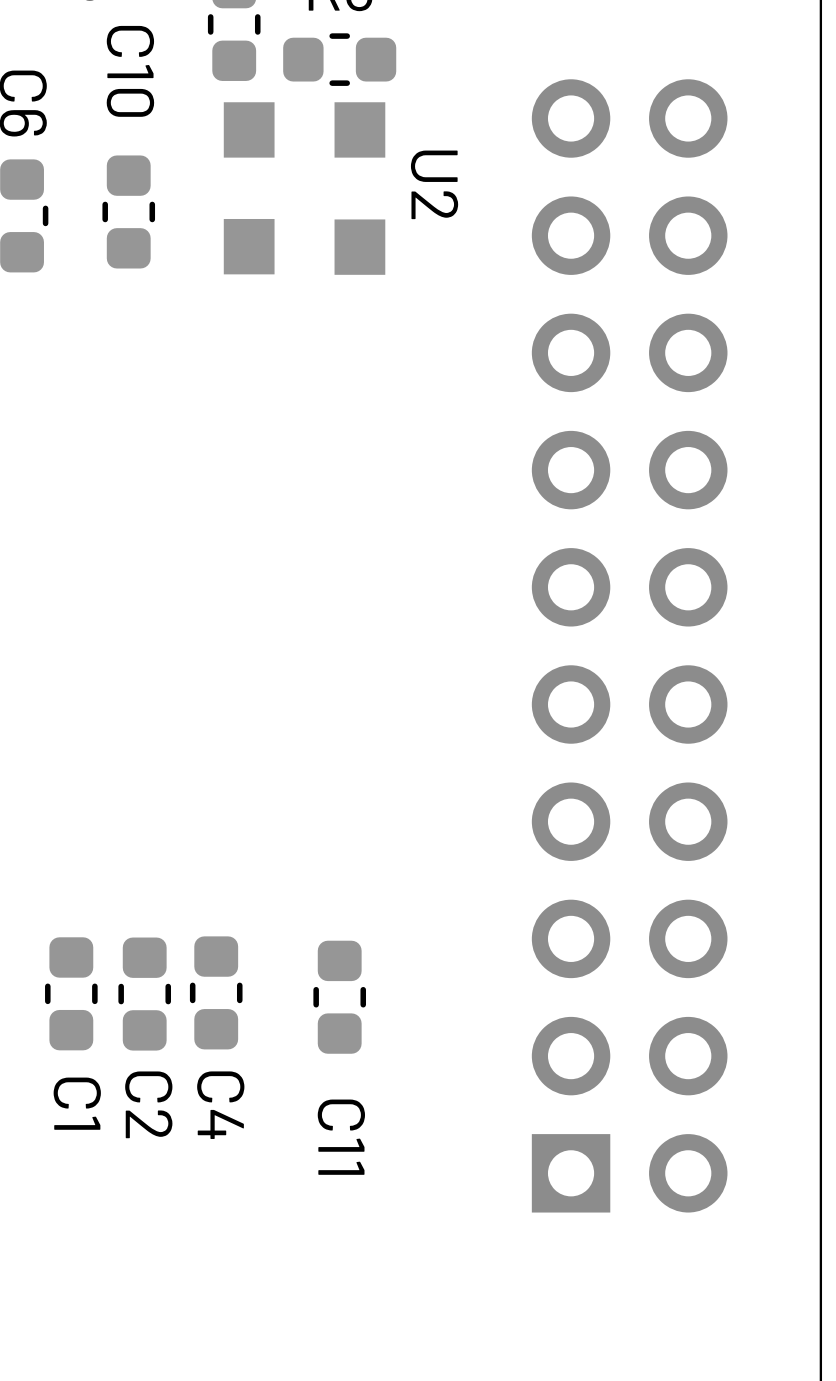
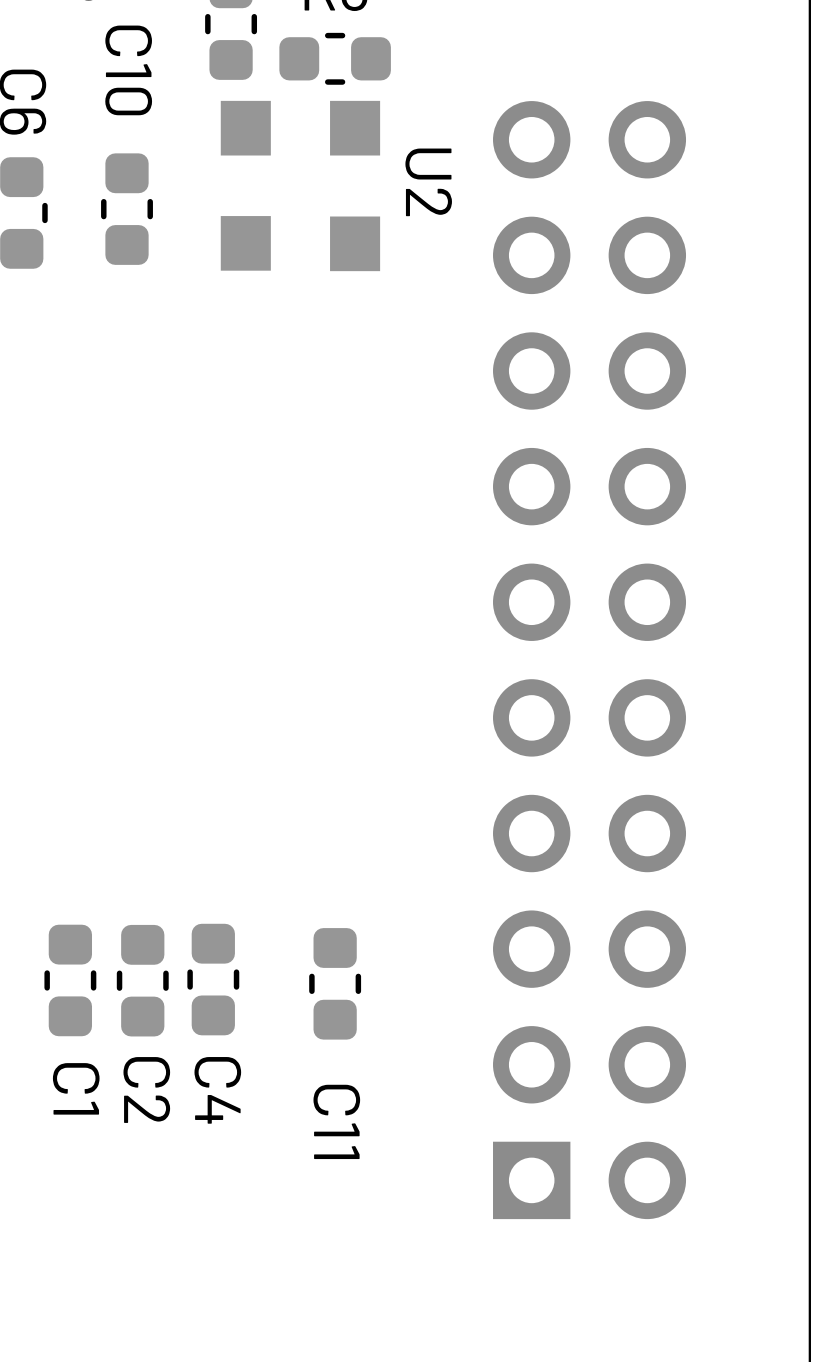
part position: (629, 645) -> (589, 660)

